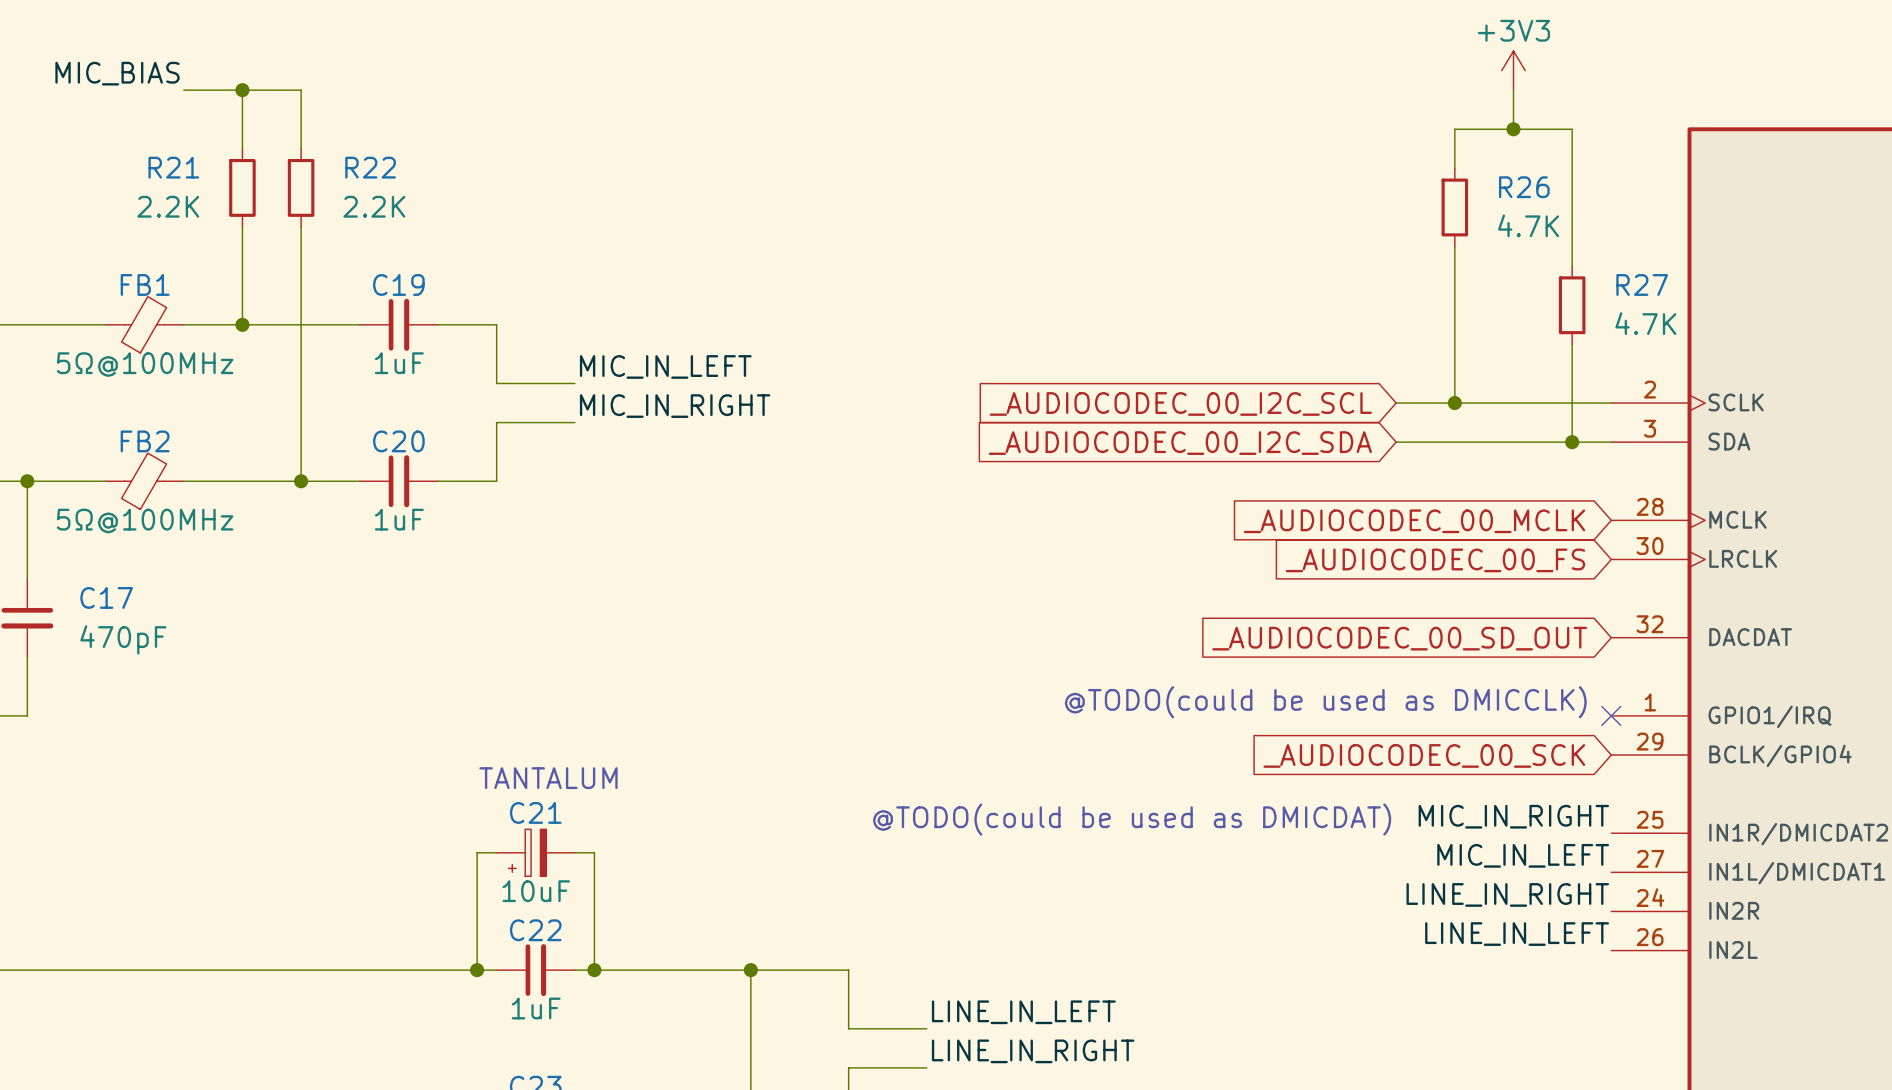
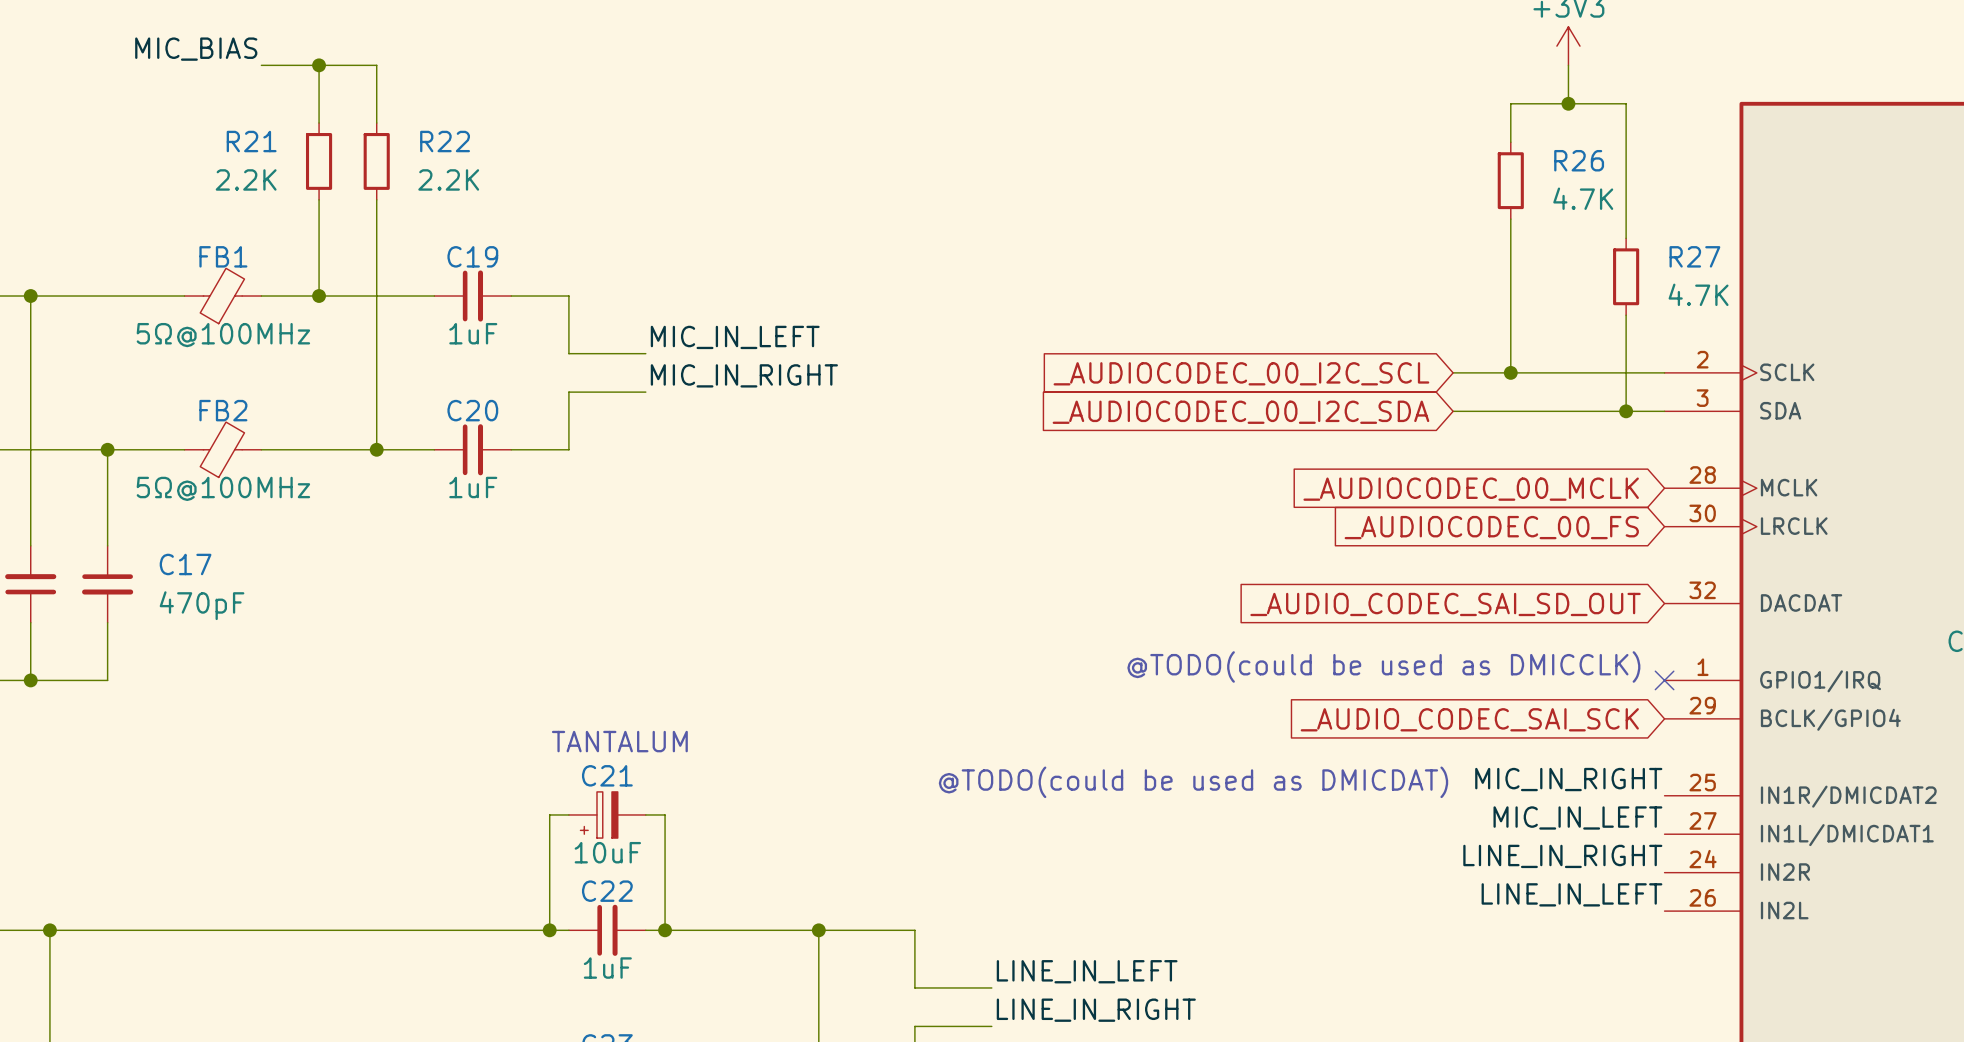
global label: _AUDIOCODEC_00_SD_OUT (1399, 638) -> _AUDIO_CODEC_SAI_SD_OUT (1445, 604)
global label: _AUDIOCODEC_00_SCK (1424, 755) -> _AUDIO_CODEC_SAI_SCK (1469, 719)

